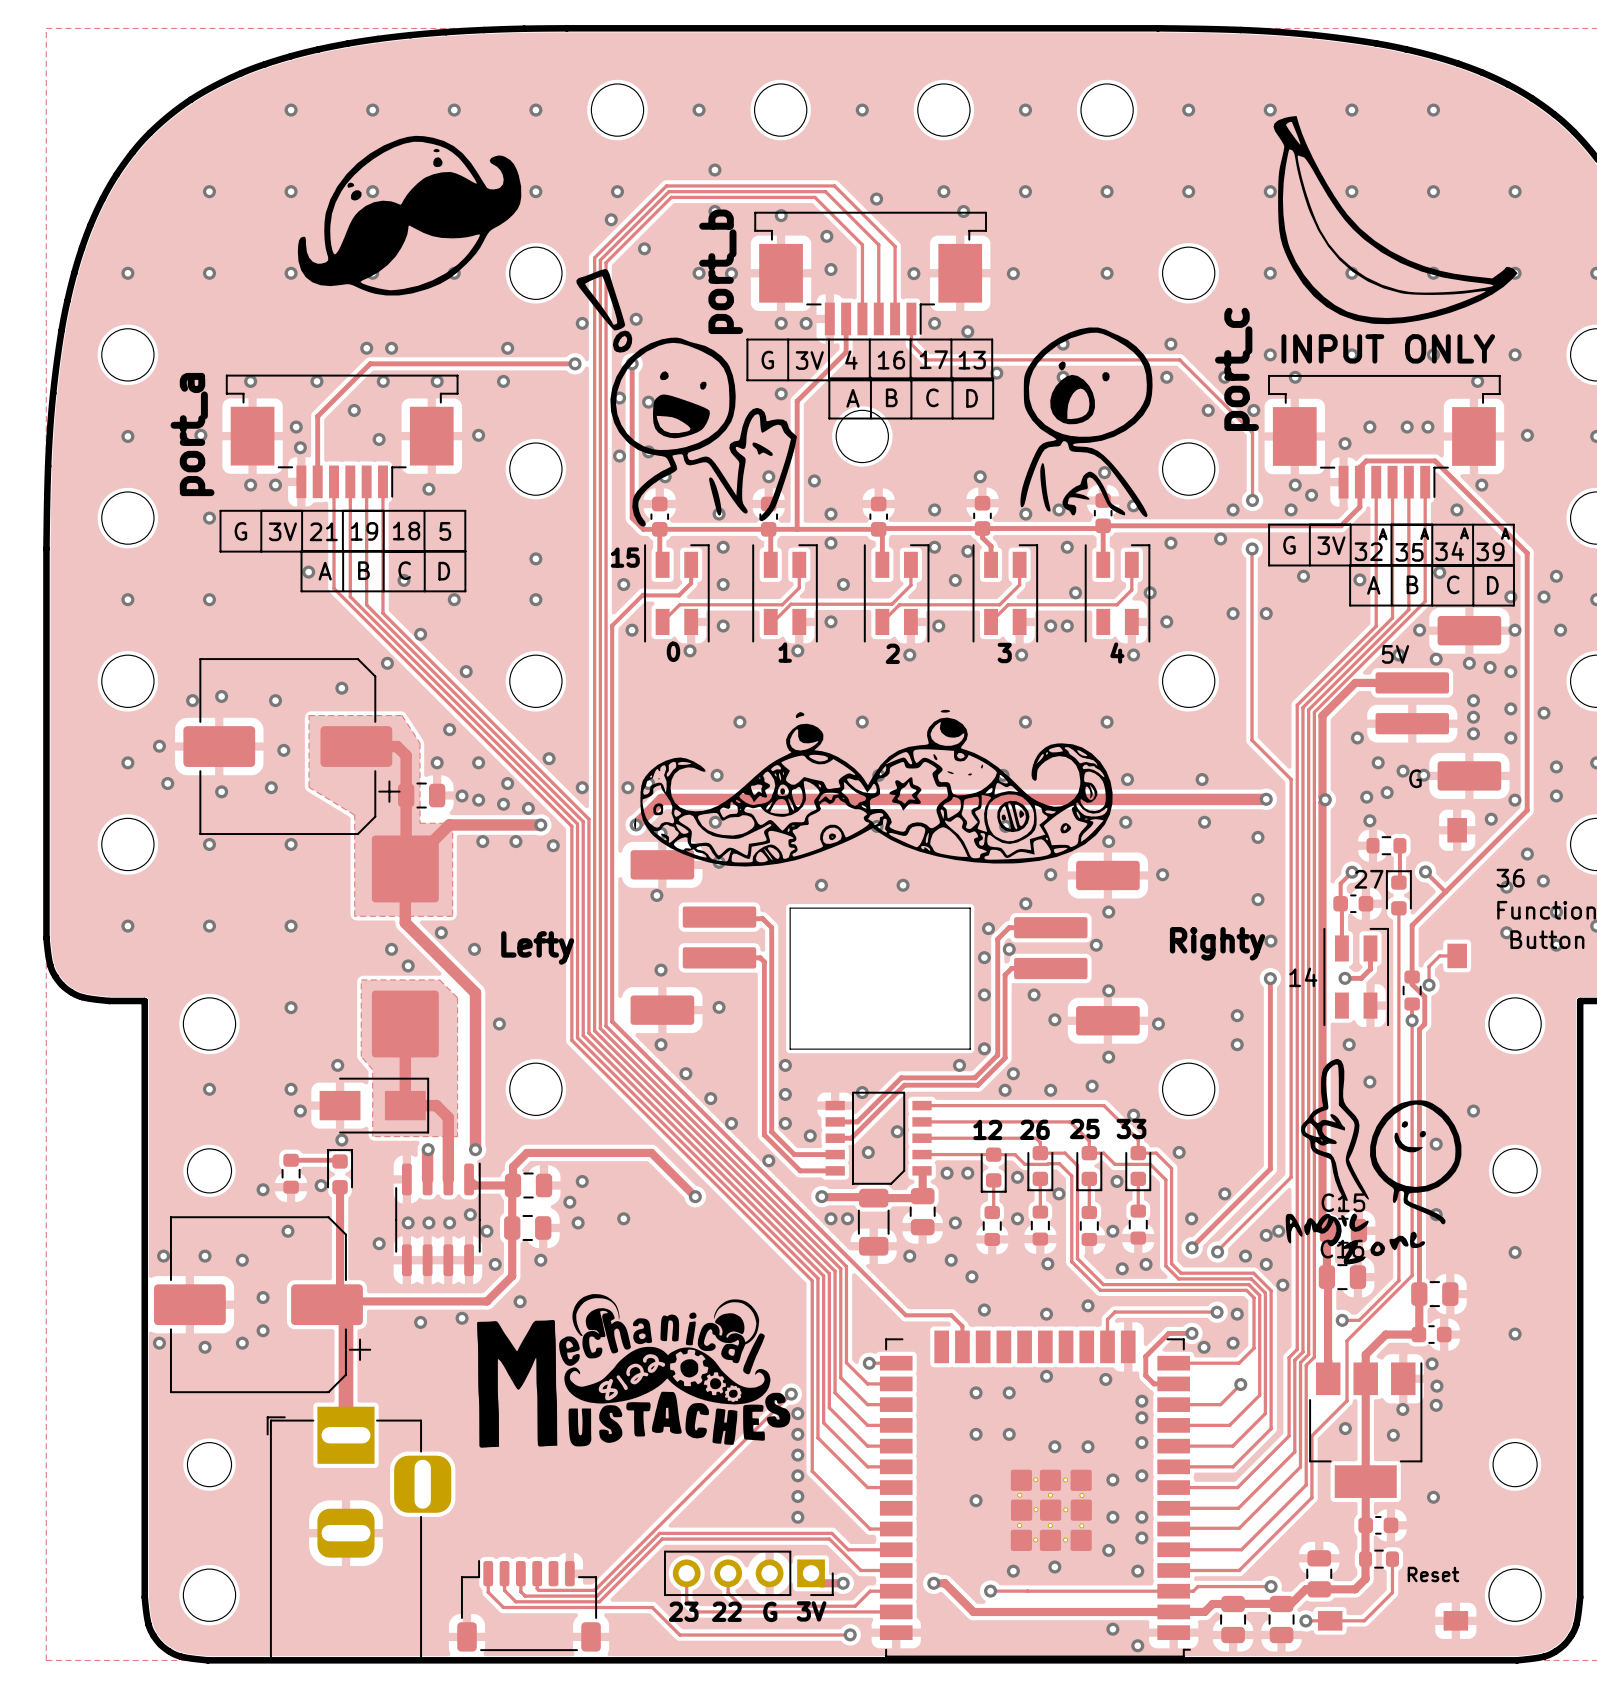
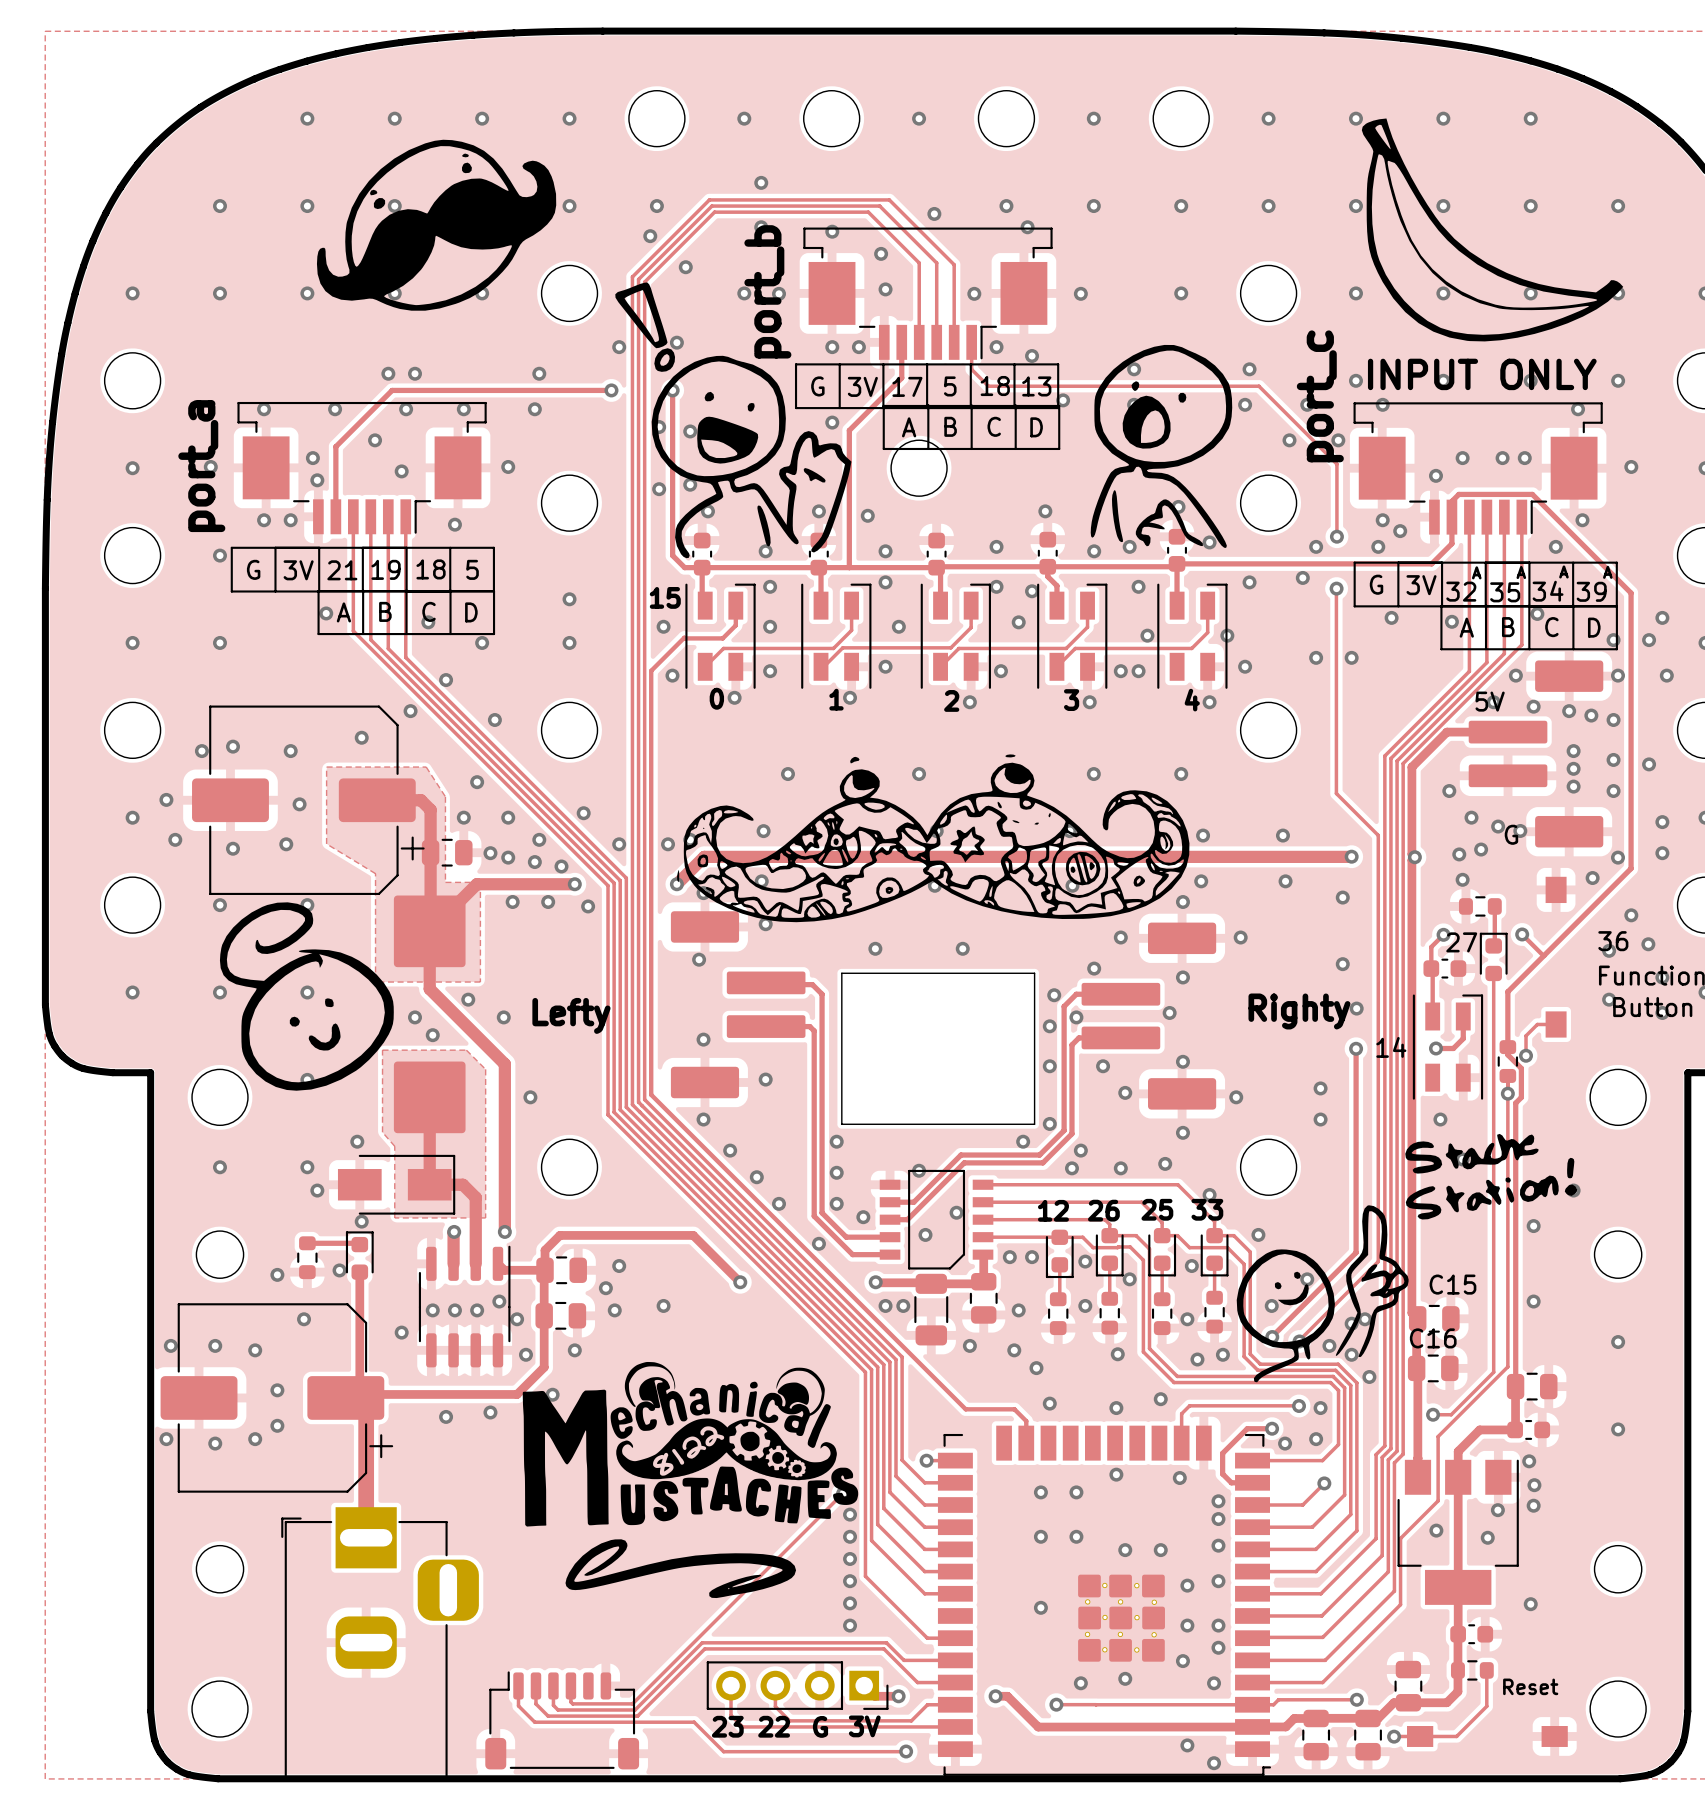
drawing shape: [297, 115, 1518, 1265] -> [316, 118, 1624, 1383]
text: 17 (933, 359) -> 18 (995, 386)
text: 4 (851, 360) -> 17 (907, 386)
text: 16 (891, 360) -> 5 (950, 386)
drawing: none -> [219, 902, 394, 1091]
drawing: none -> [1405, 1133, 1578, 1220]
C15 name position: C15 (1343, 1202) -> C15 (1452, 1284)
drawing position: (633, 1370) -> (690, 1444)
drawing: none -> [565, 1539, 797, 1599]

